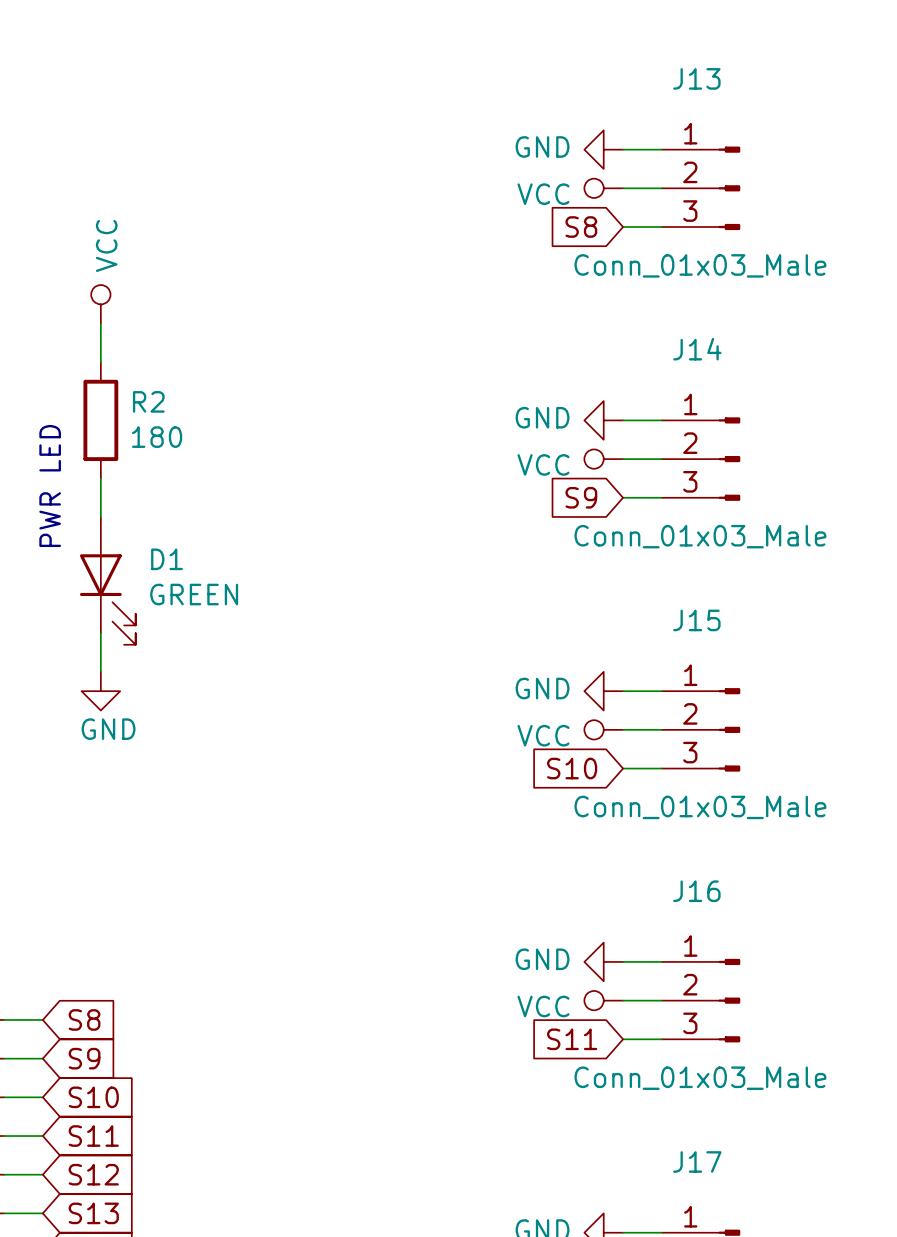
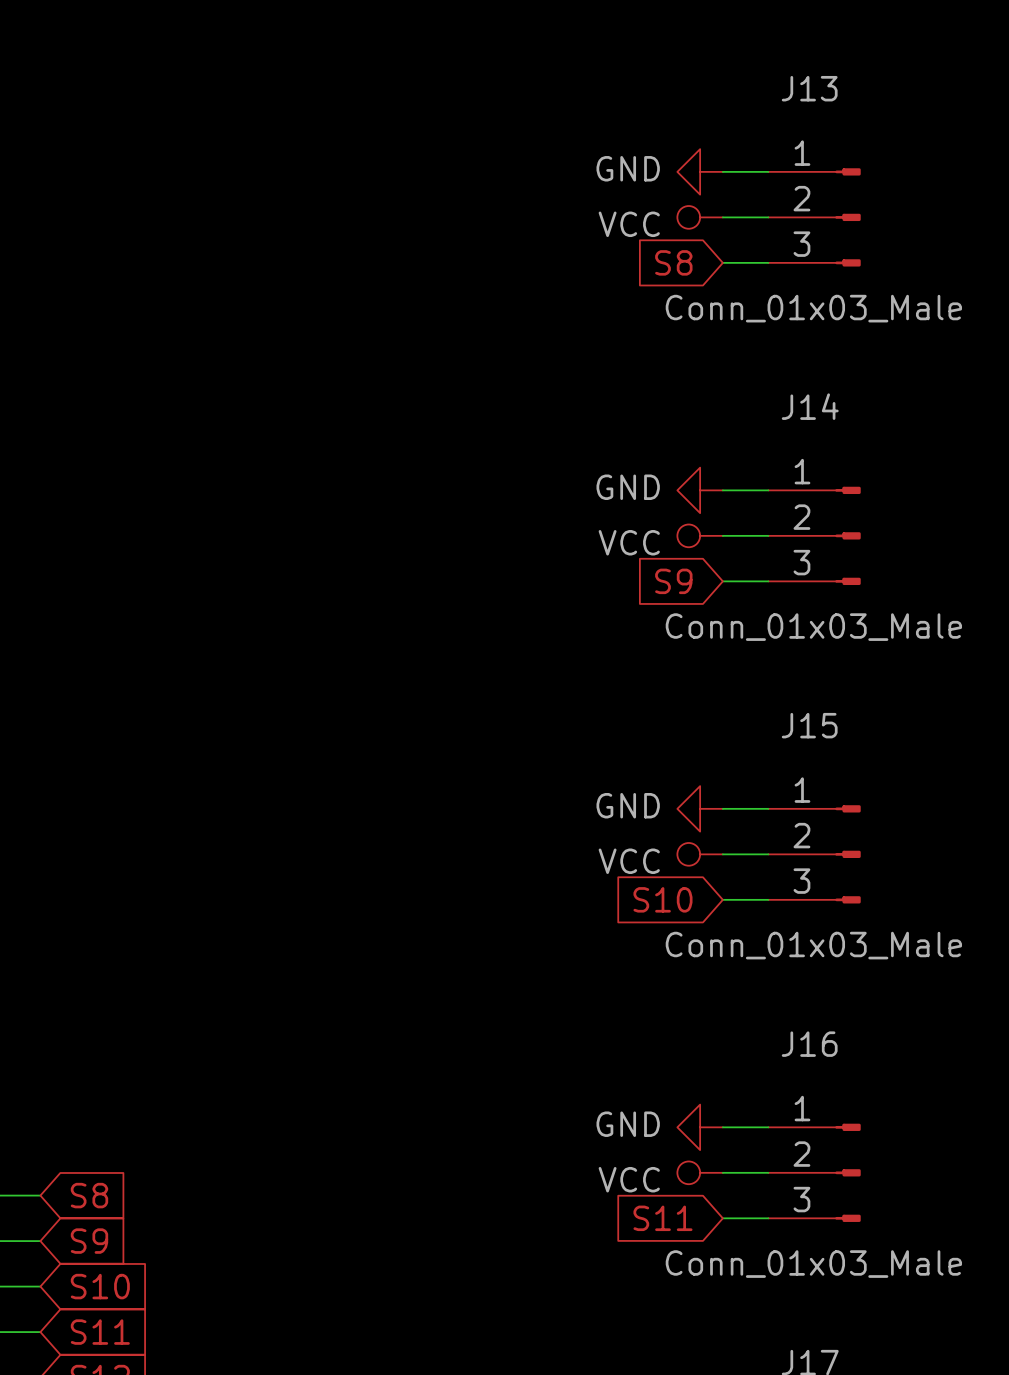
power symbol: VCC (100, 304) -> none
wire: (100, 323) (100, 362) -> none
R2: 180 (100, 420) -> none
wire: (100, 478) (100, 517) -> none
text: PWR LED (50, 485) -> none
D1: GREEN (107, 580) -> none
wire: (100, 633) (100, 671) -> none
power symbol: GND (100, 691) -> none

